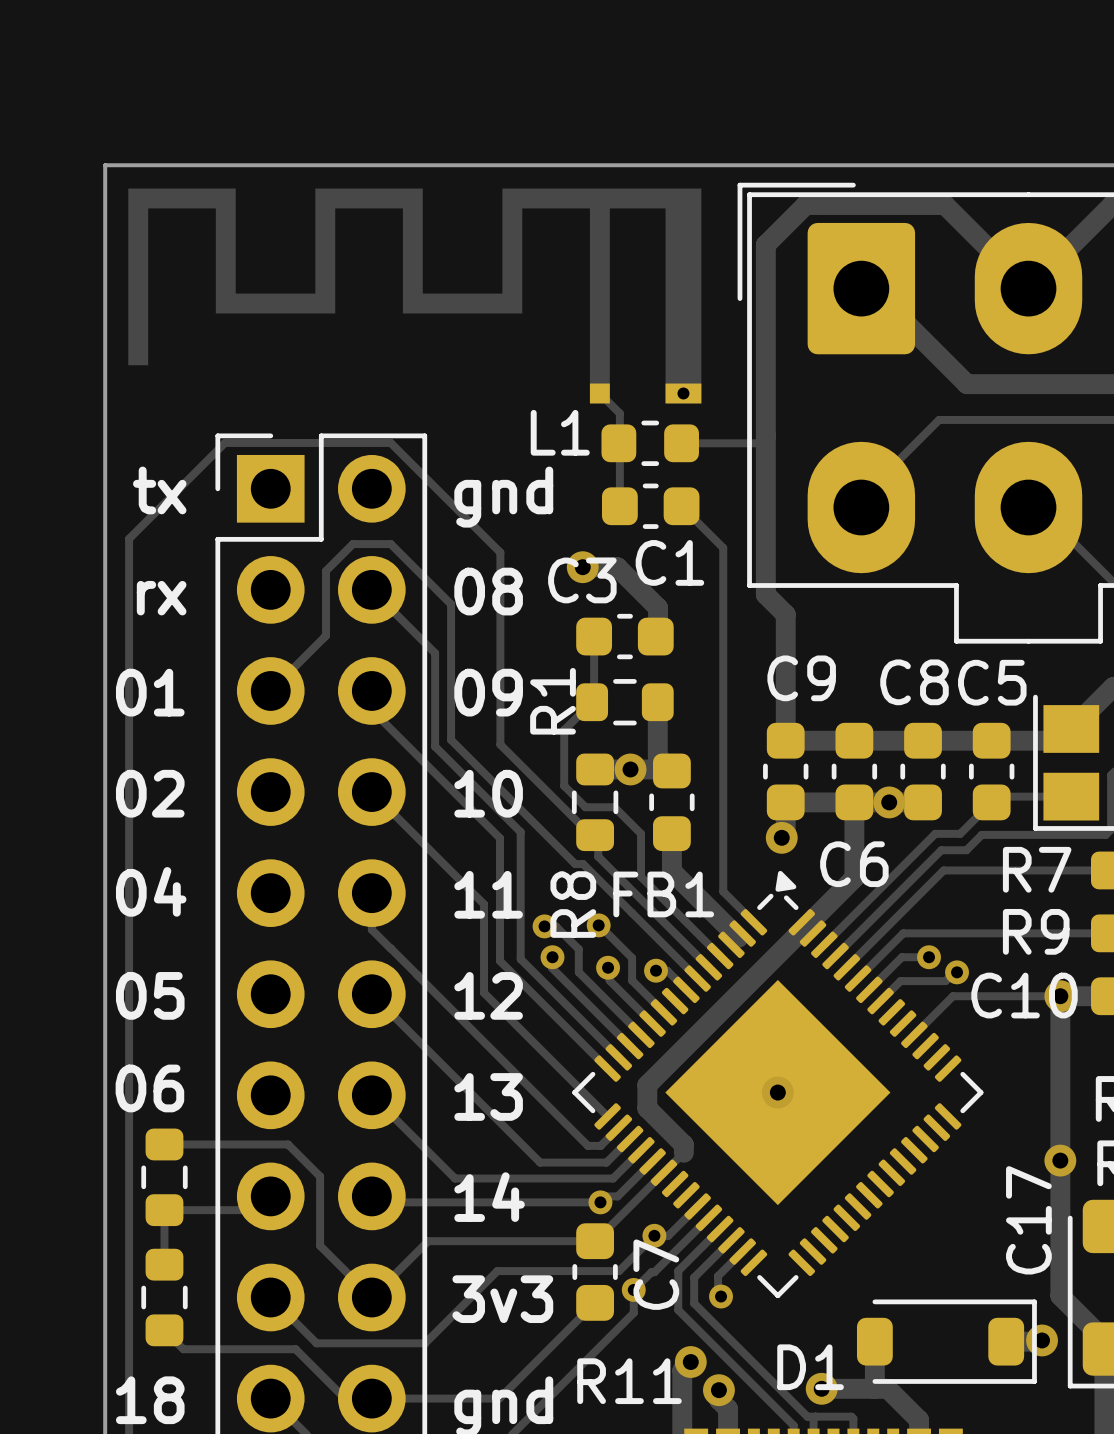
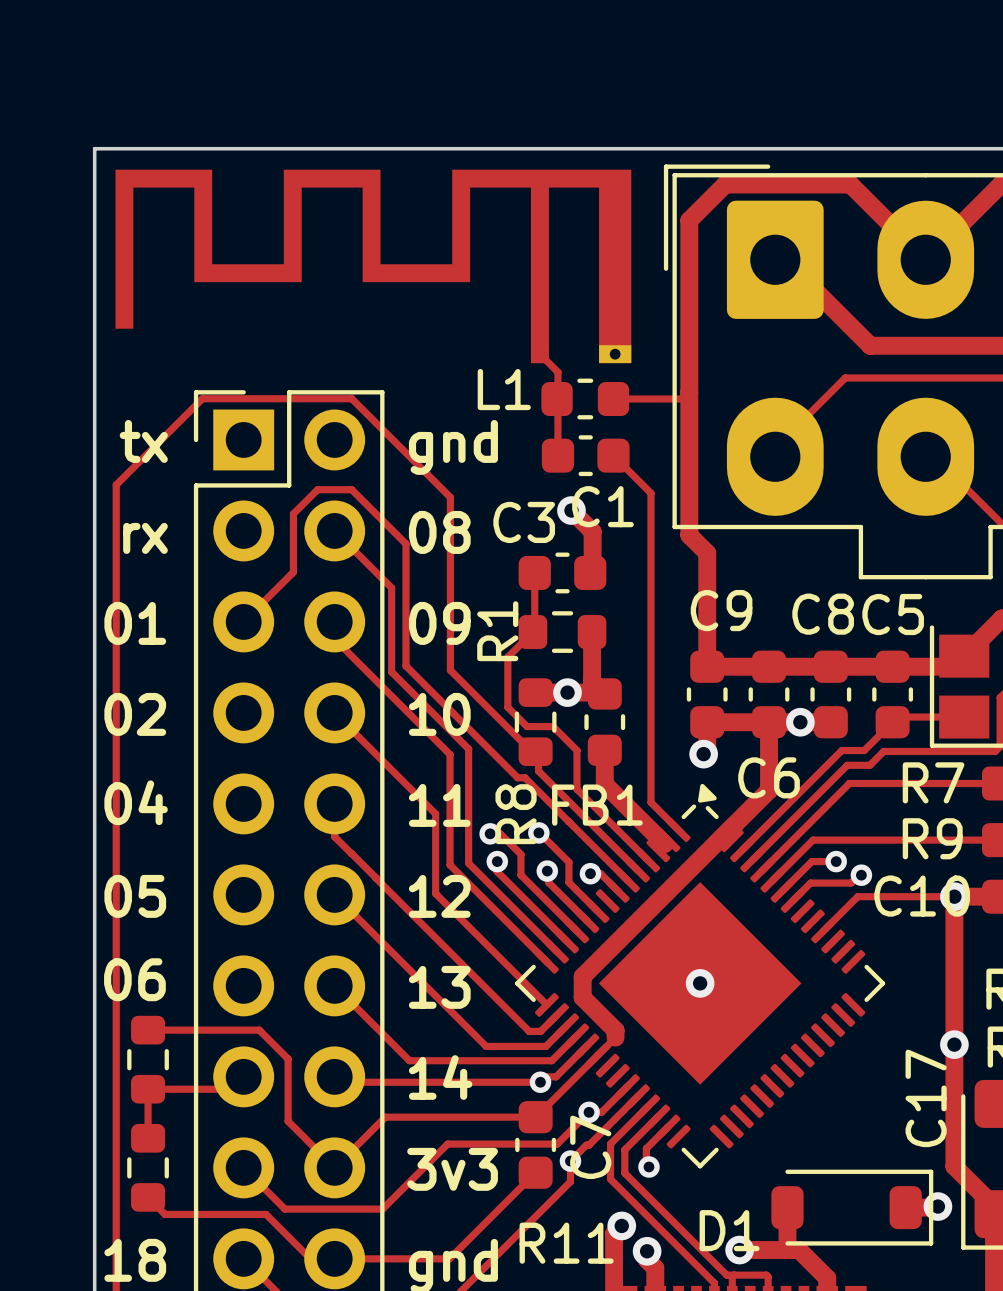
track: (582, 567) (617, 567) (658, 607) (658, 638) -> (571, 510) (592, 531) (592, 574)
via position: (582, 567) -> (571, 510)

